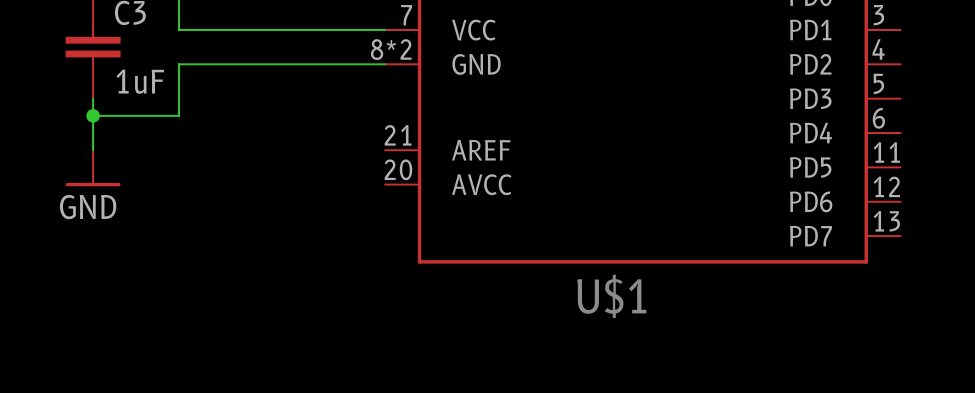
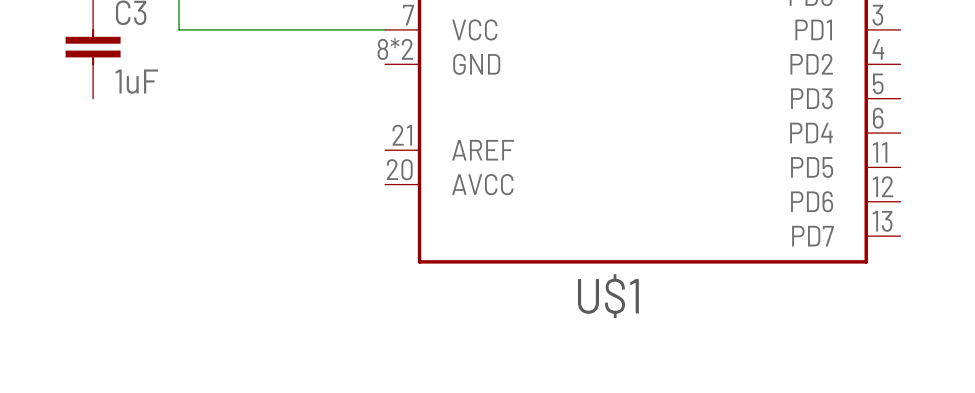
wire: (385, 64) (179, 64) (179, 115) (93, 115) -> none
wire: (93, 98) (93, 150) -> none
junction: (93, 115) -> none
power symbol: GND (93, 168) -> none

